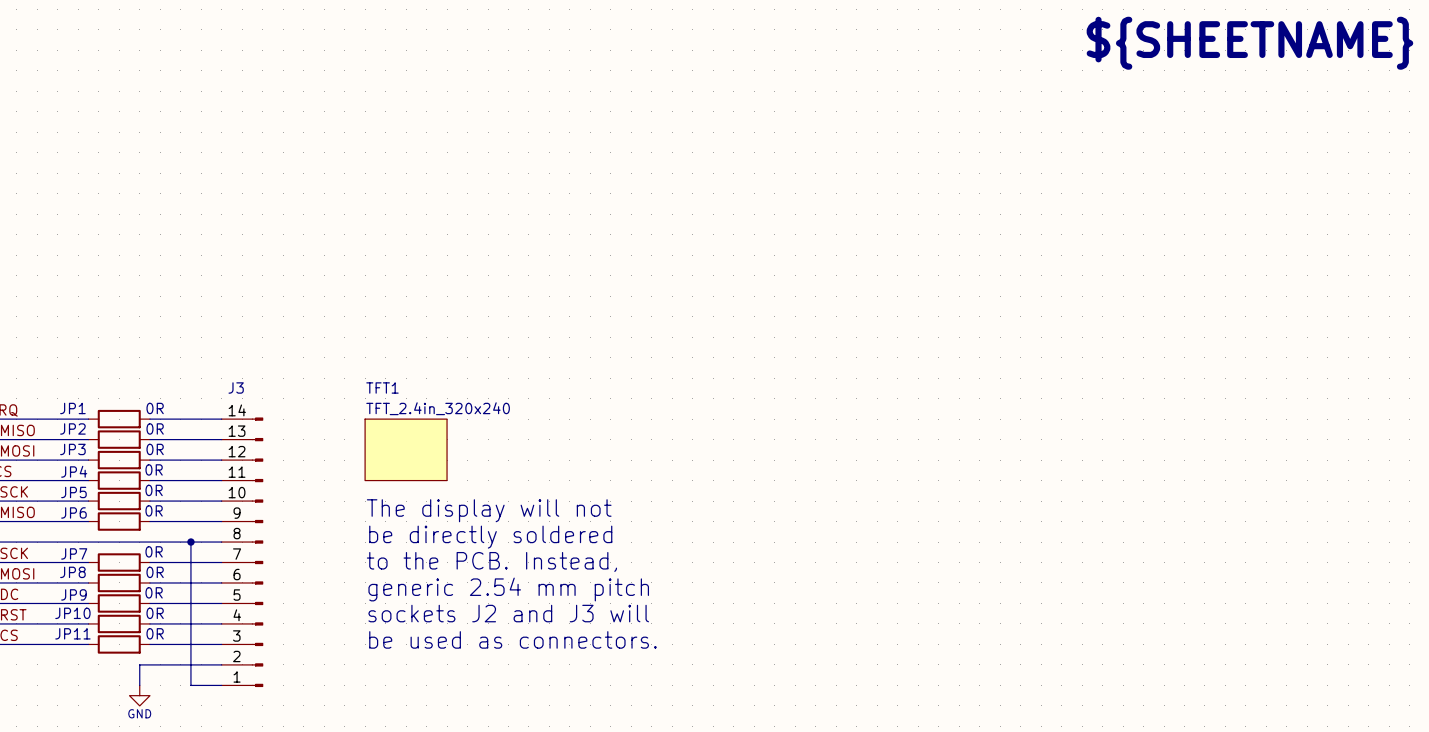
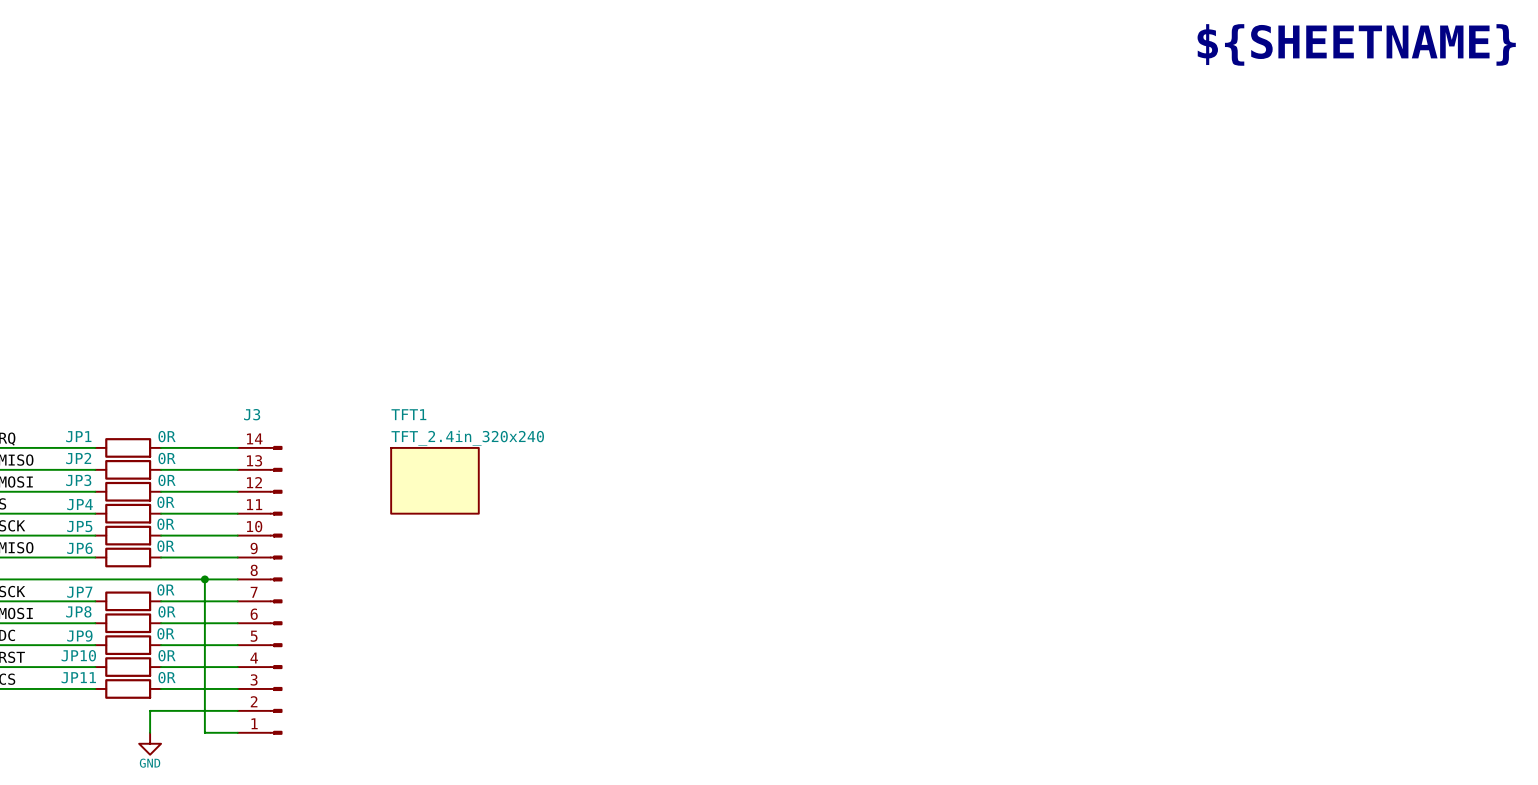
text: The display will not (489, 510) -> none
text: be directly soldered (490, 537) -> none
text: to the PCB. Instead, (491, 561) -> none
text: generic 2.54 mm pitch (508, 589) -> none
text: sockets J2 and J3 will (508, 613) -> none
text: be used as connectors. (513, 639) -> none

